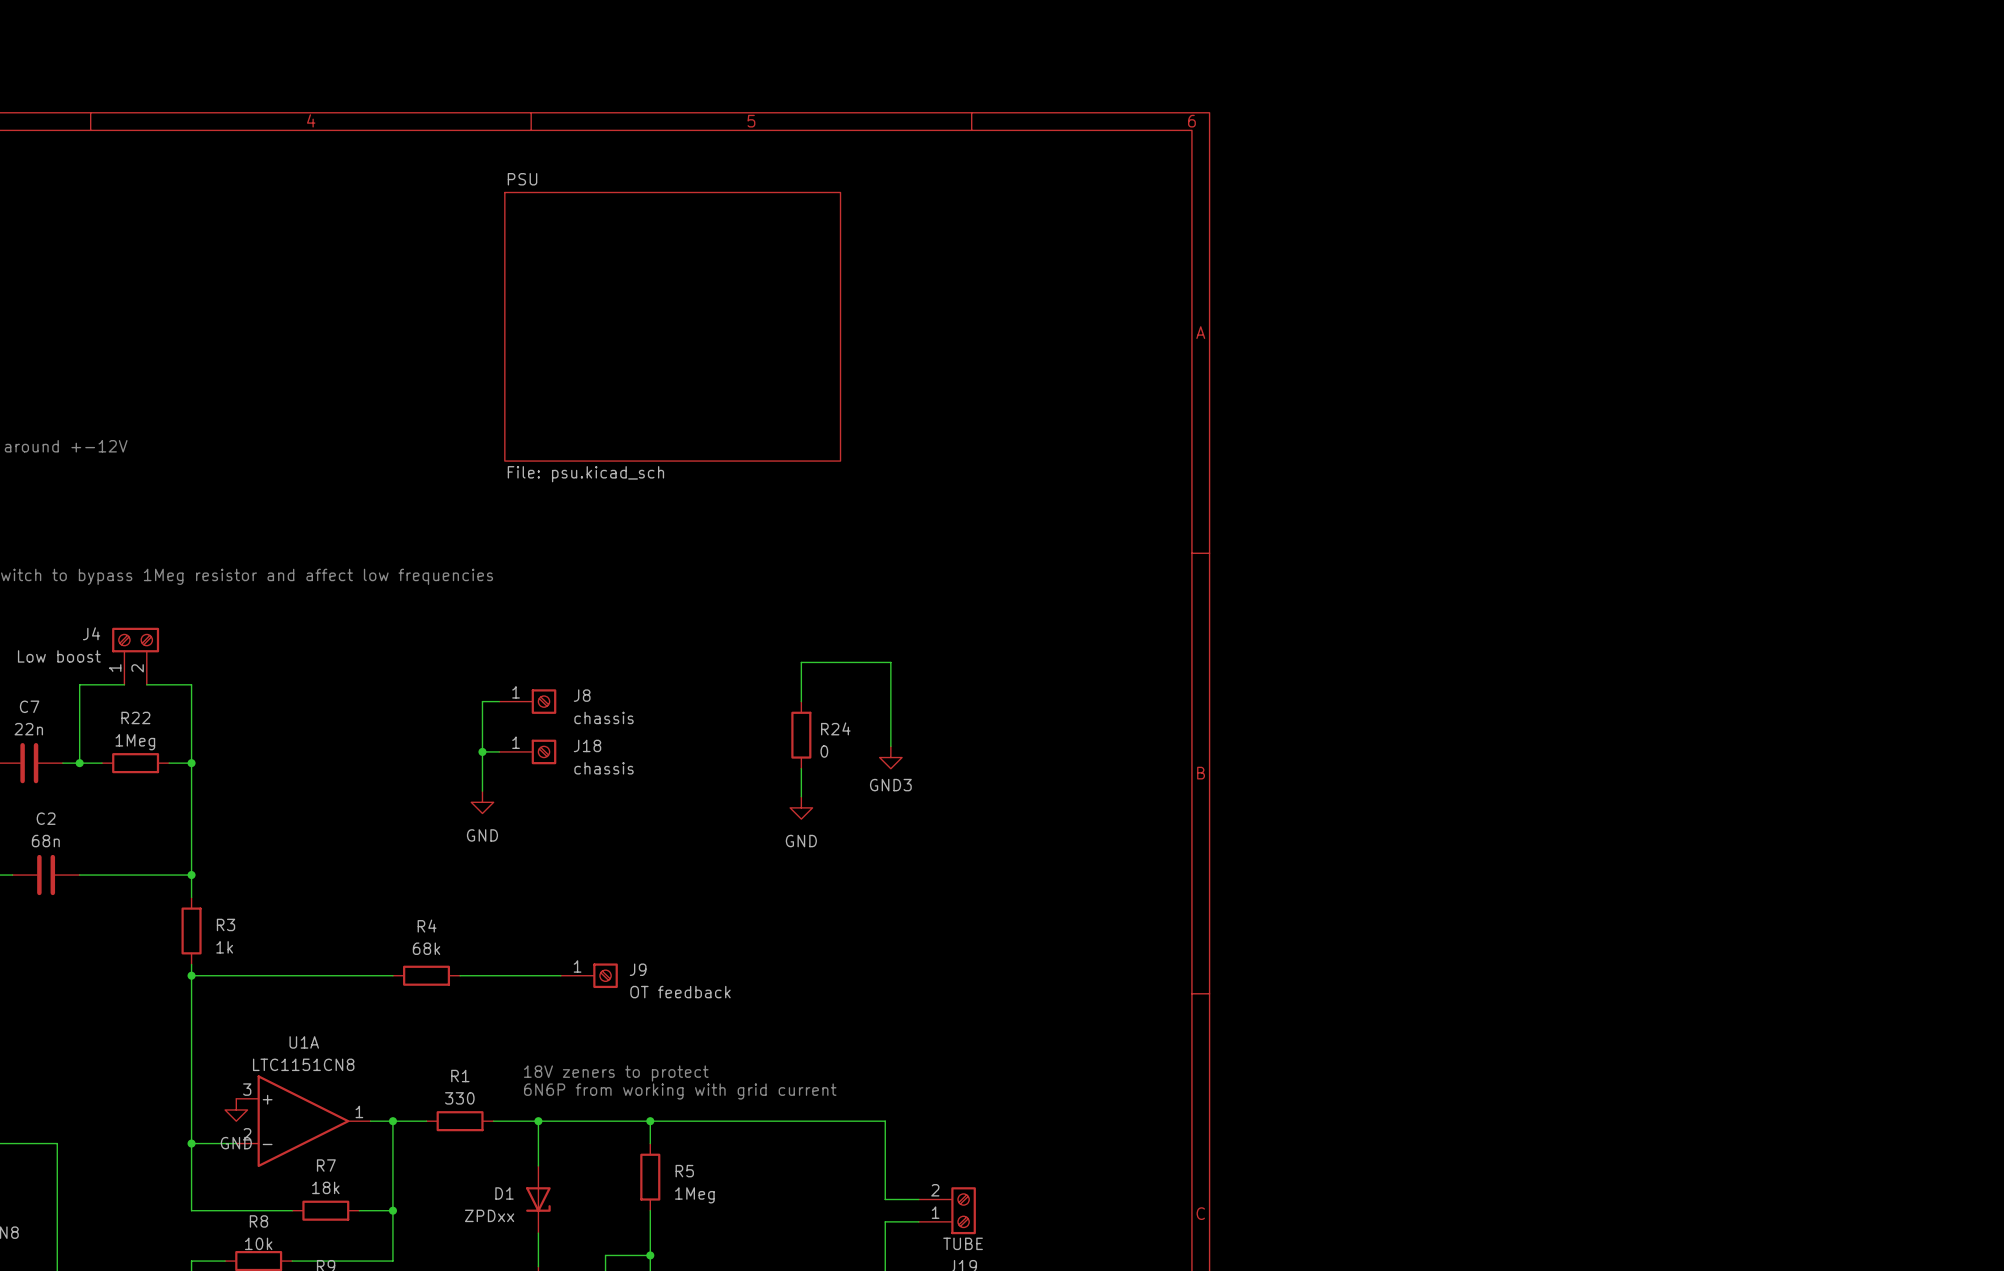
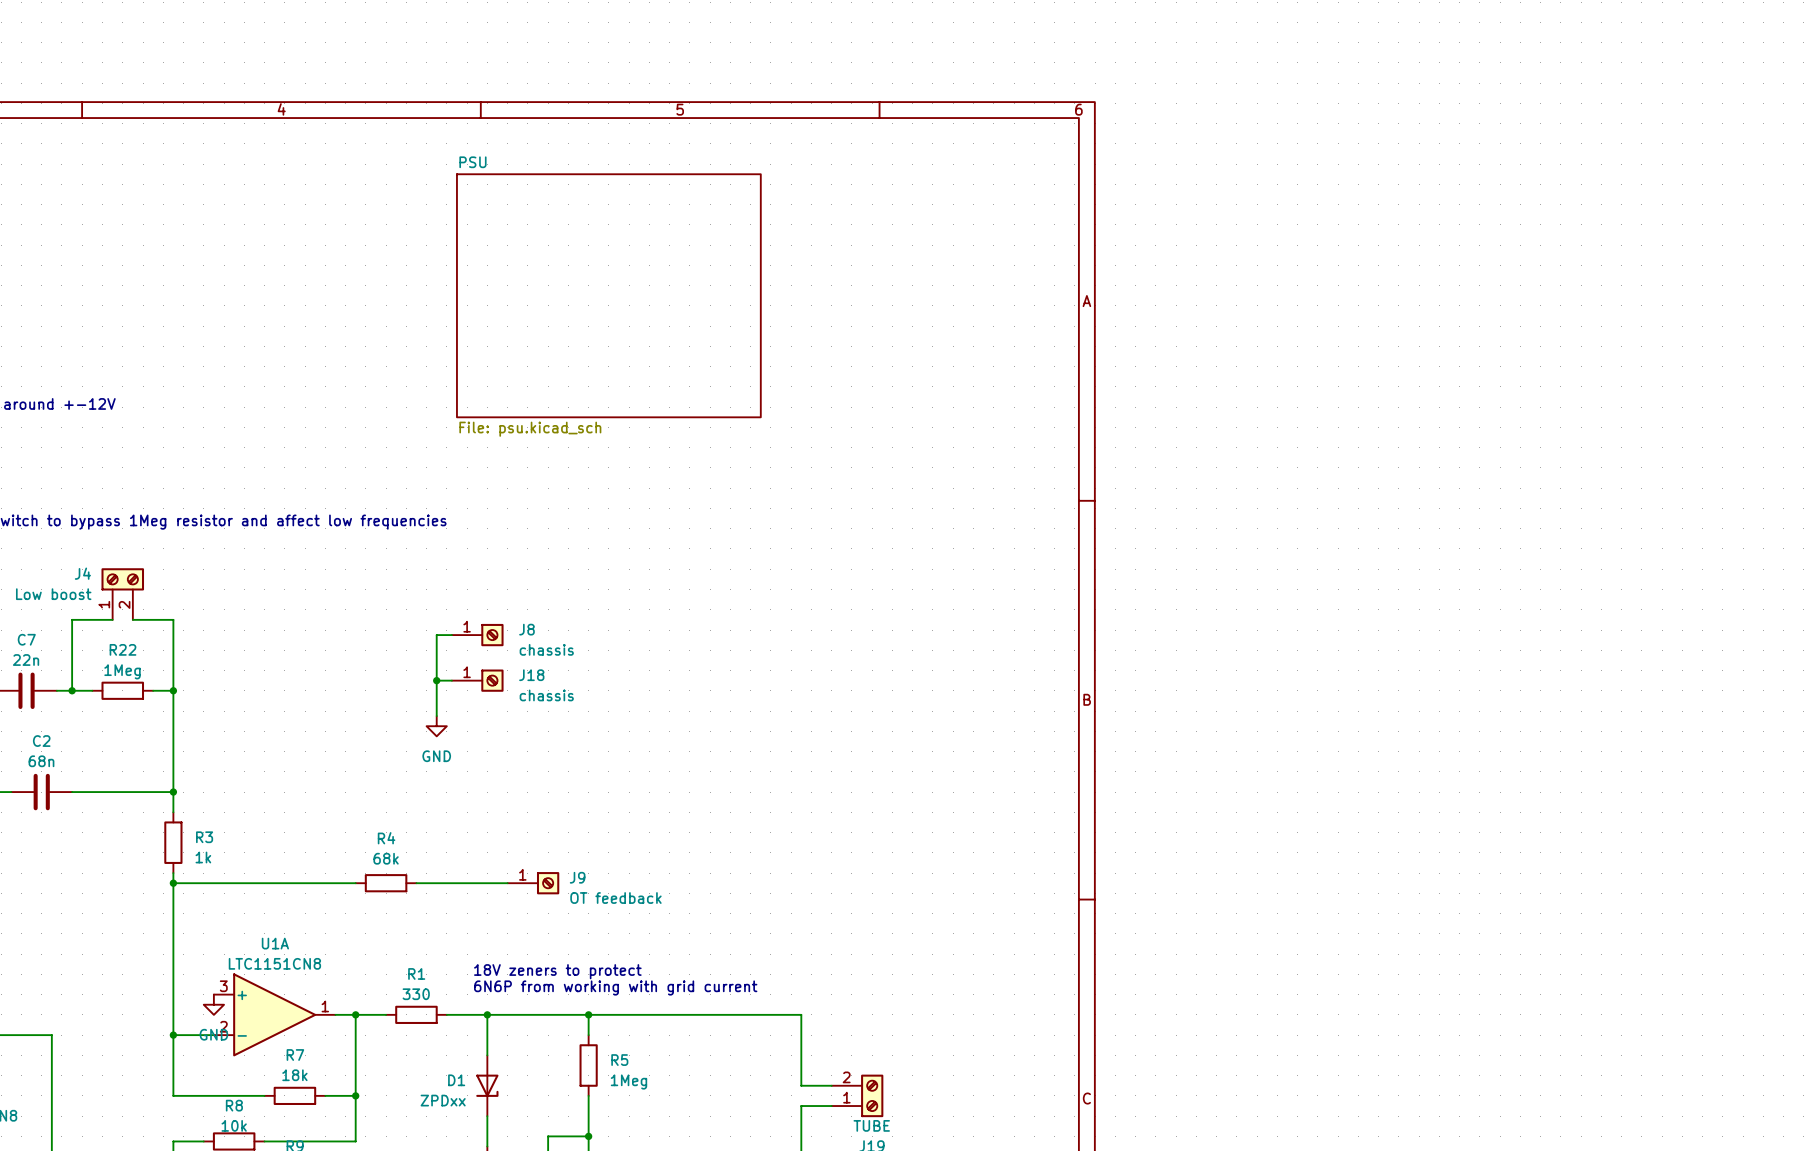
wire: (801, 701) (801, 662) (890, 662) (890, 746) -> none
R24: 0 (801, 735) -> none
power symbol: GND3 (890, 757) -> none
wire: (801, 768) (801, 796) -> none
power symbol: GND (801, 807) -> none

